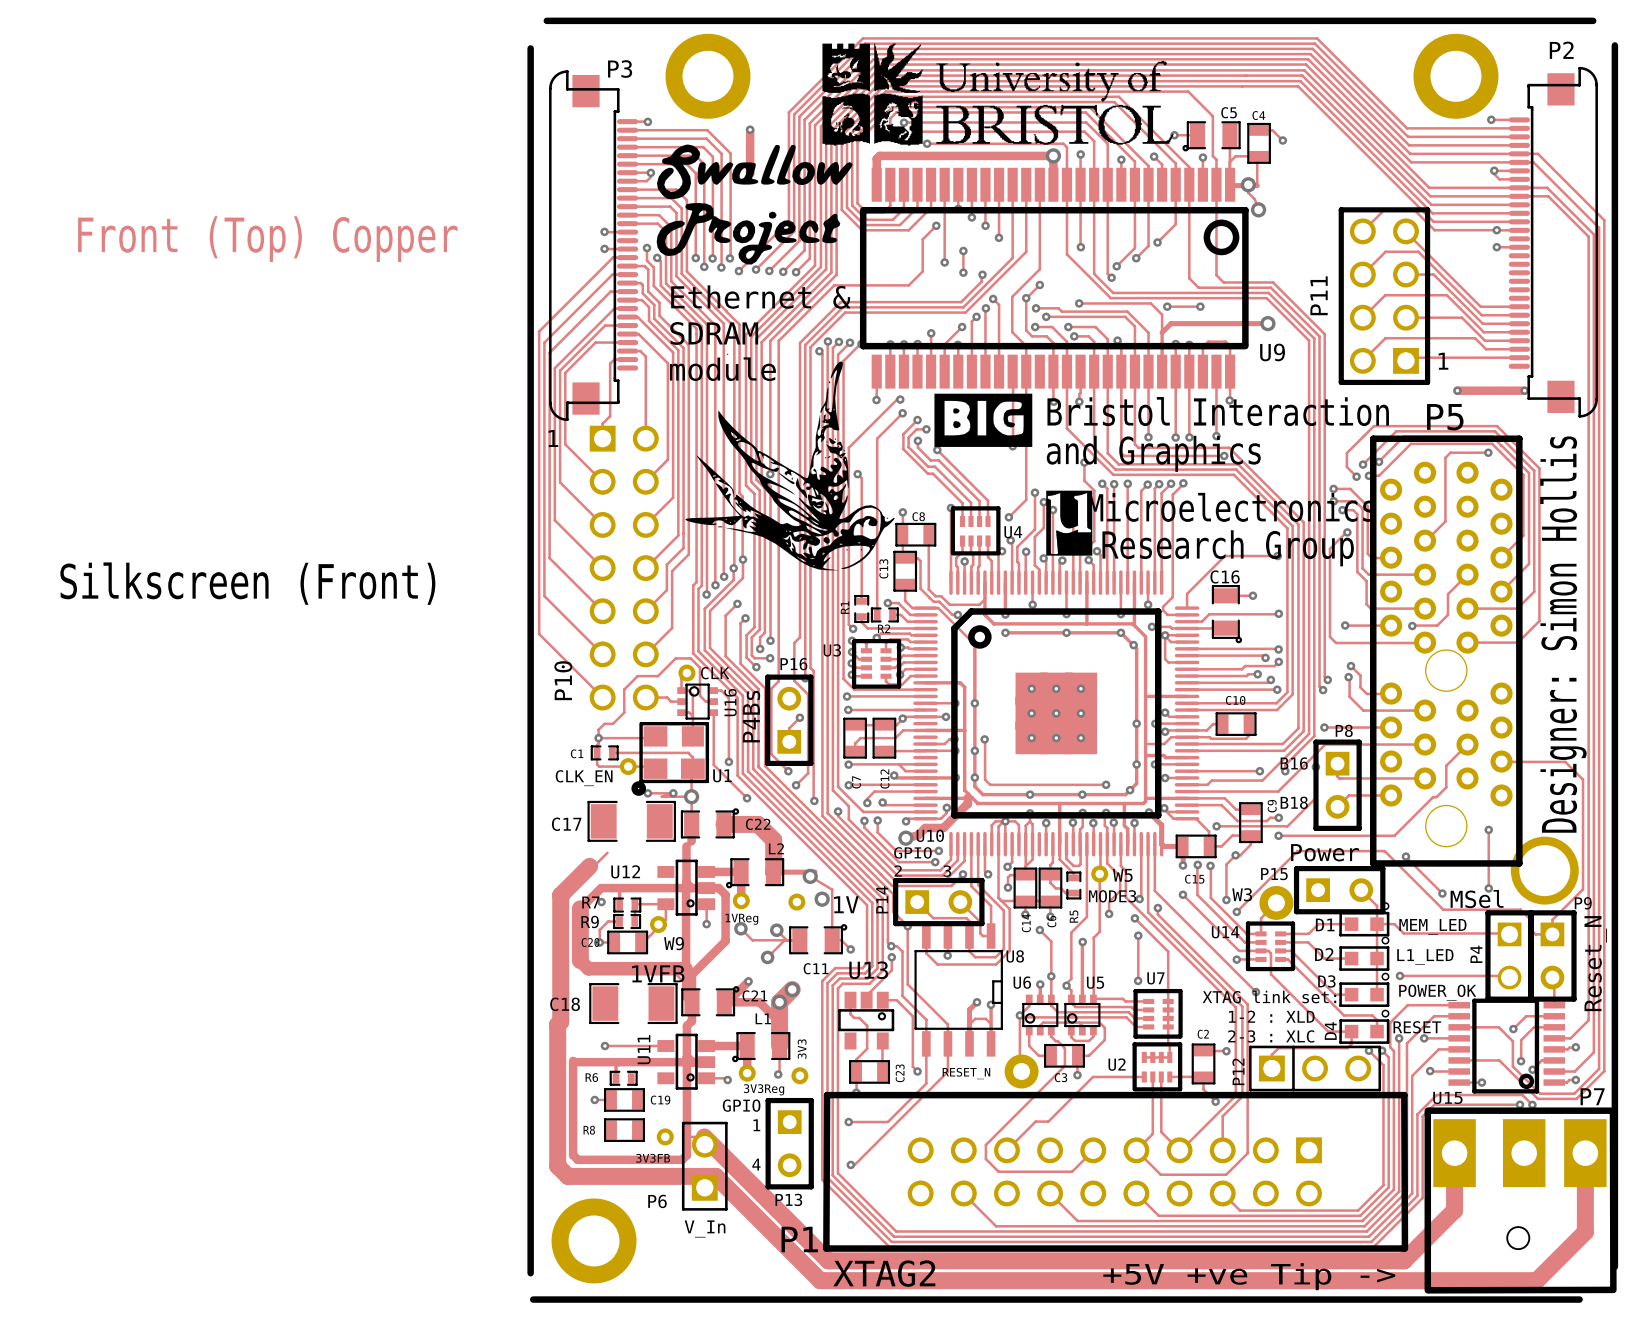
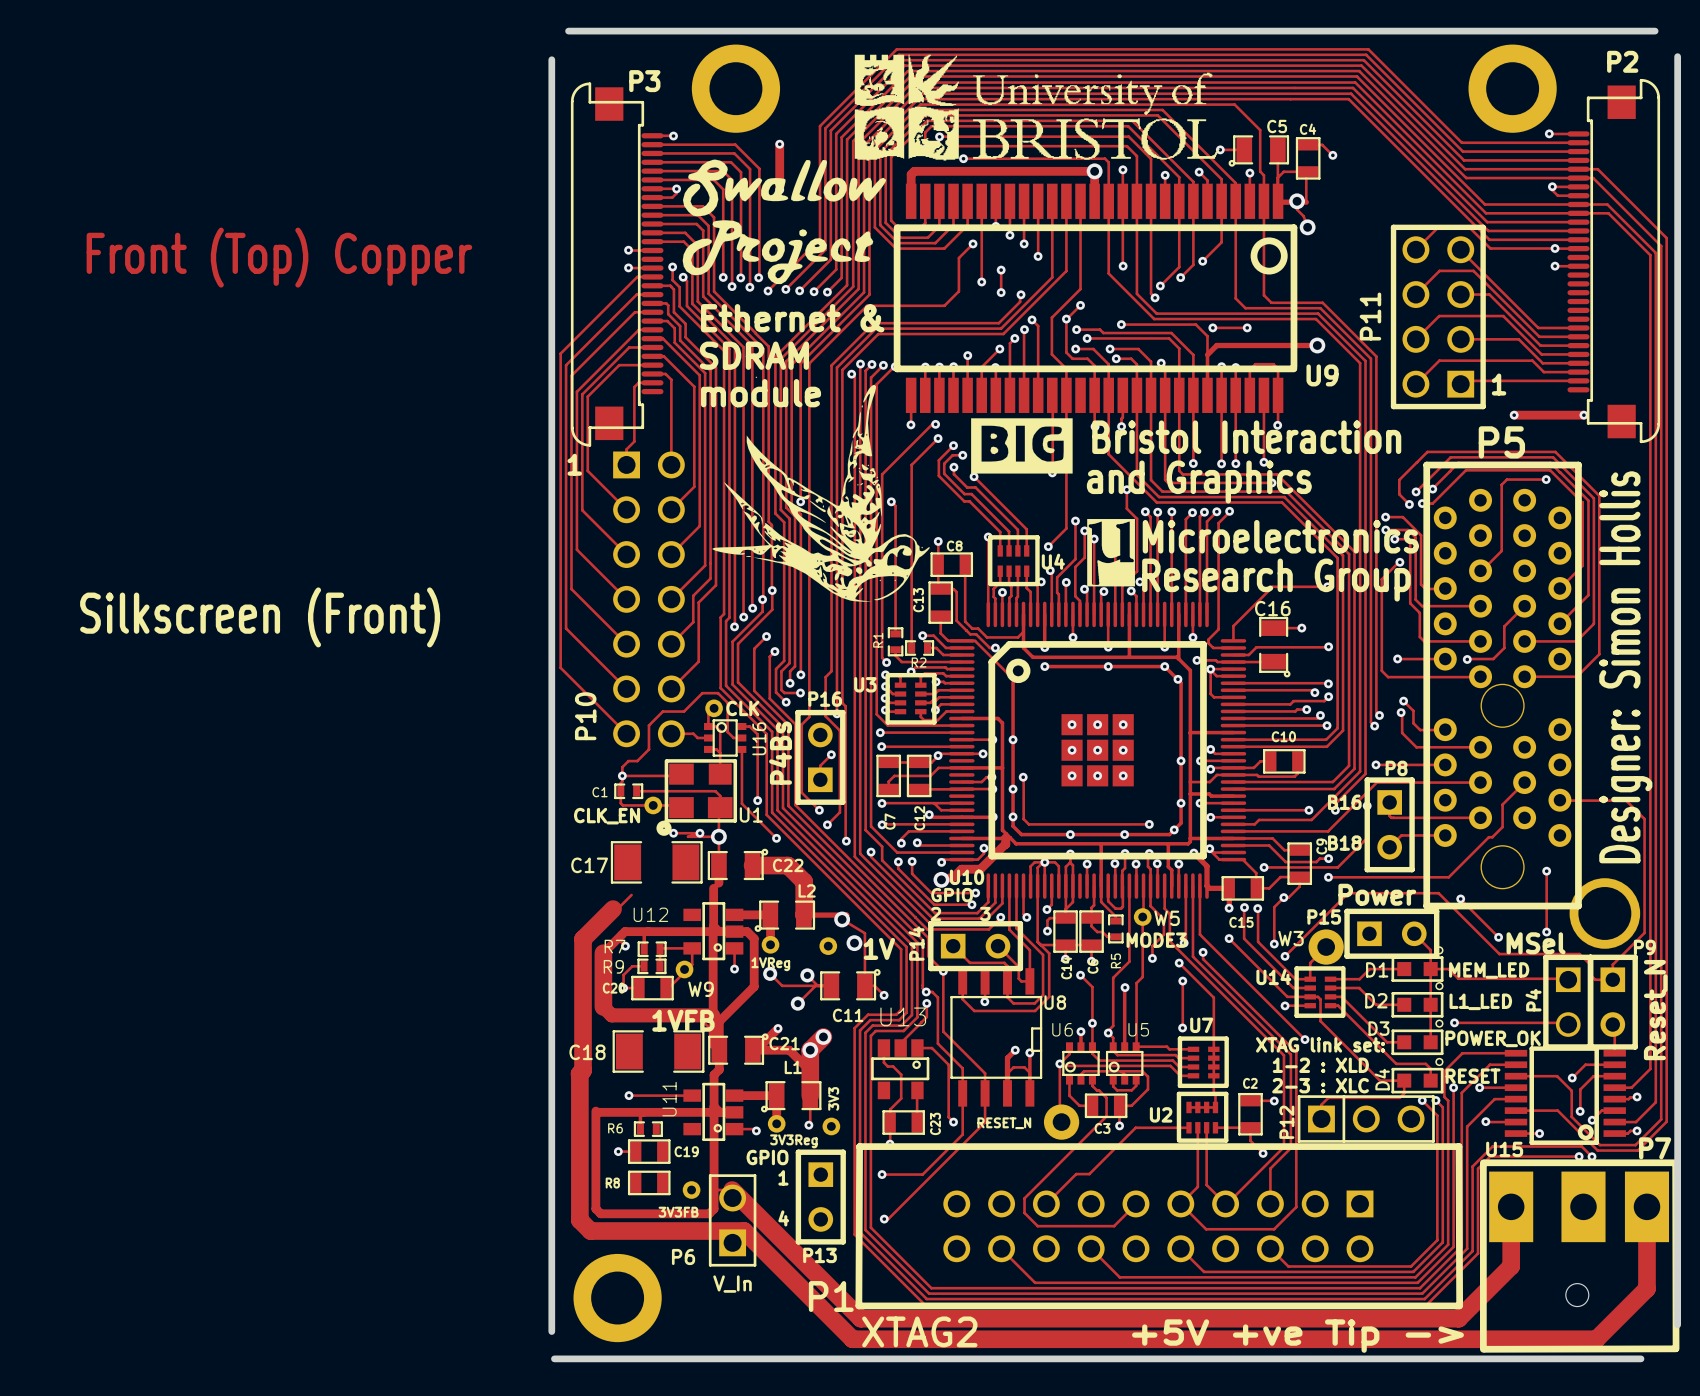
U10 footprint: [913, 570, 1200, 857] -> [949, 601, 1247, 899]

